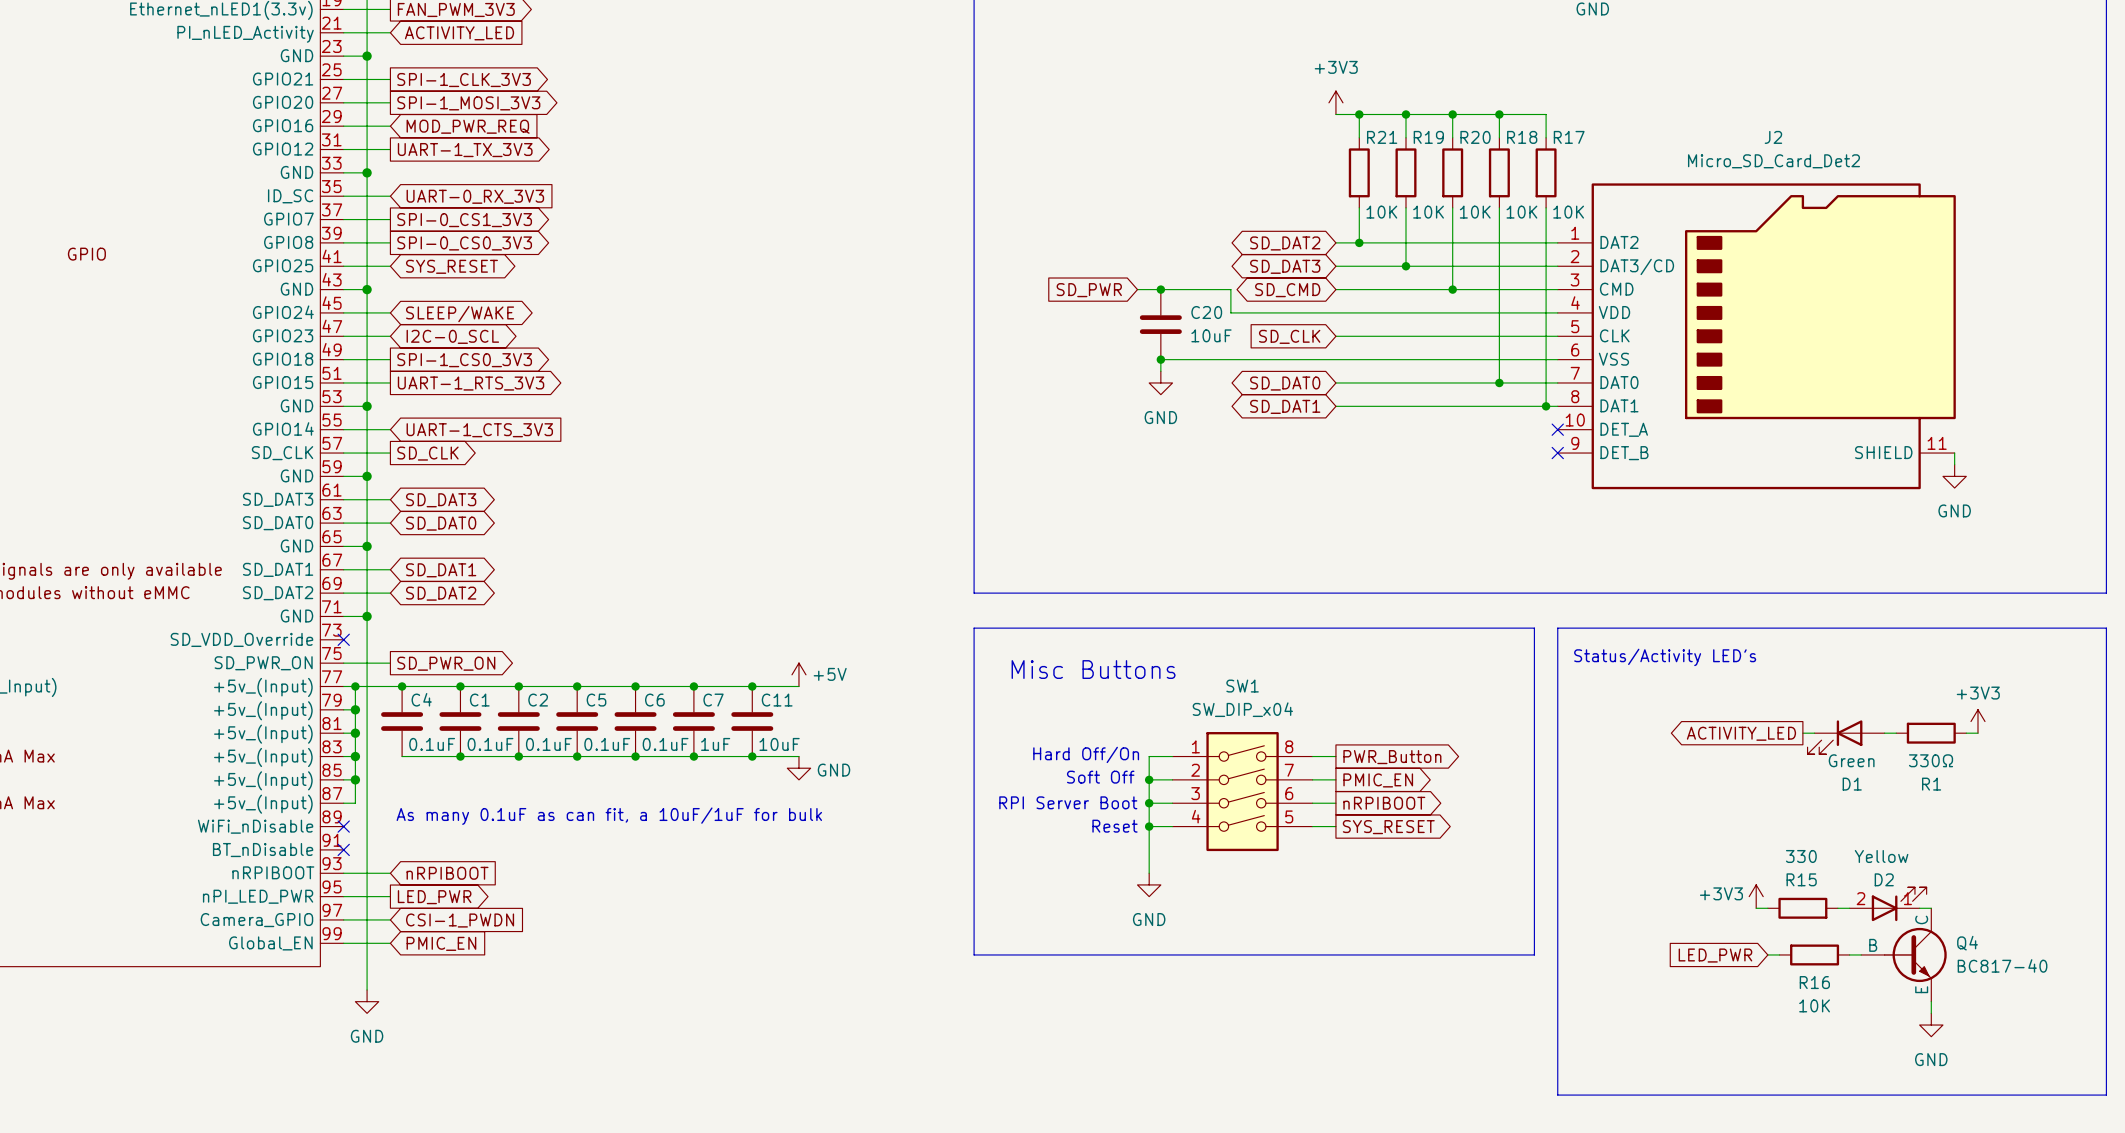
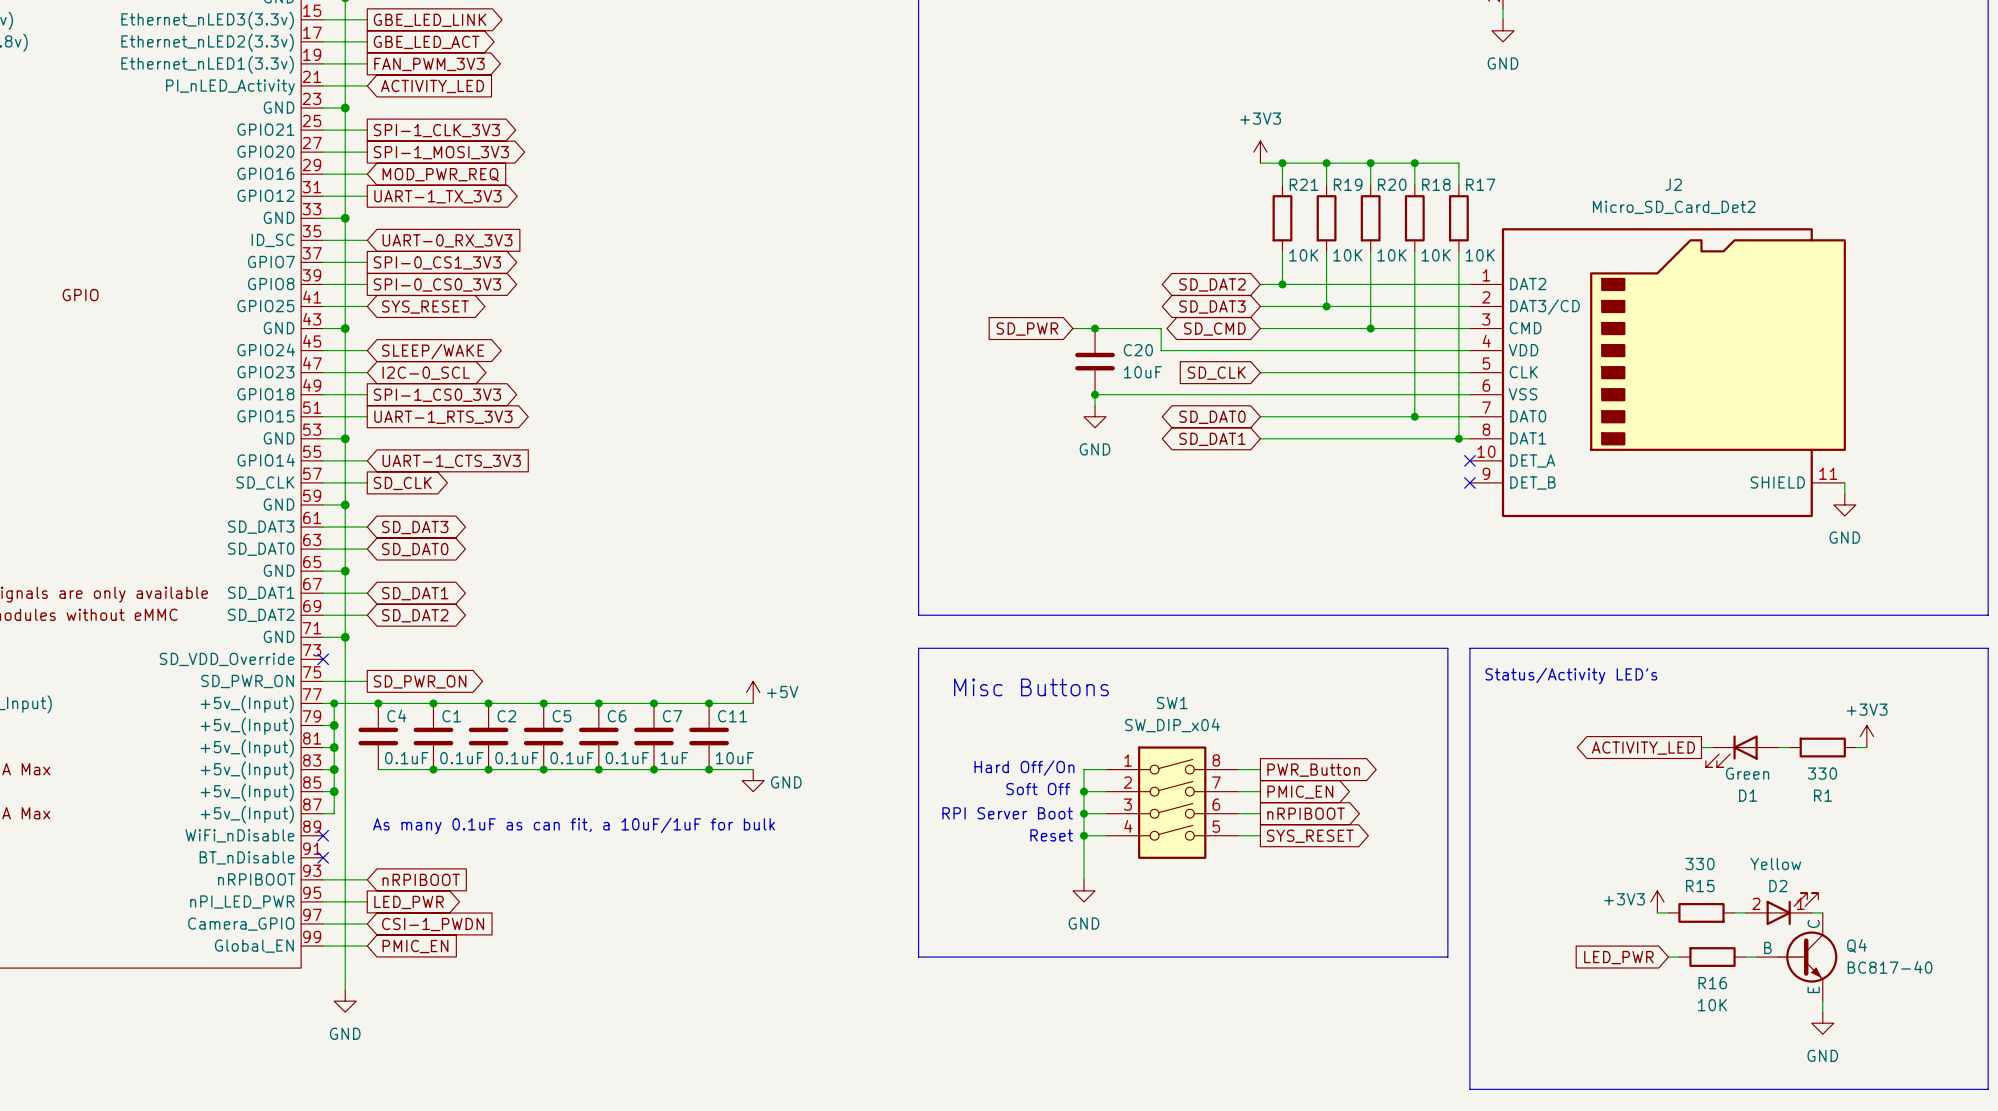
R1 value: 330Ω (1931, 760) -> 330 (1822, 773)

